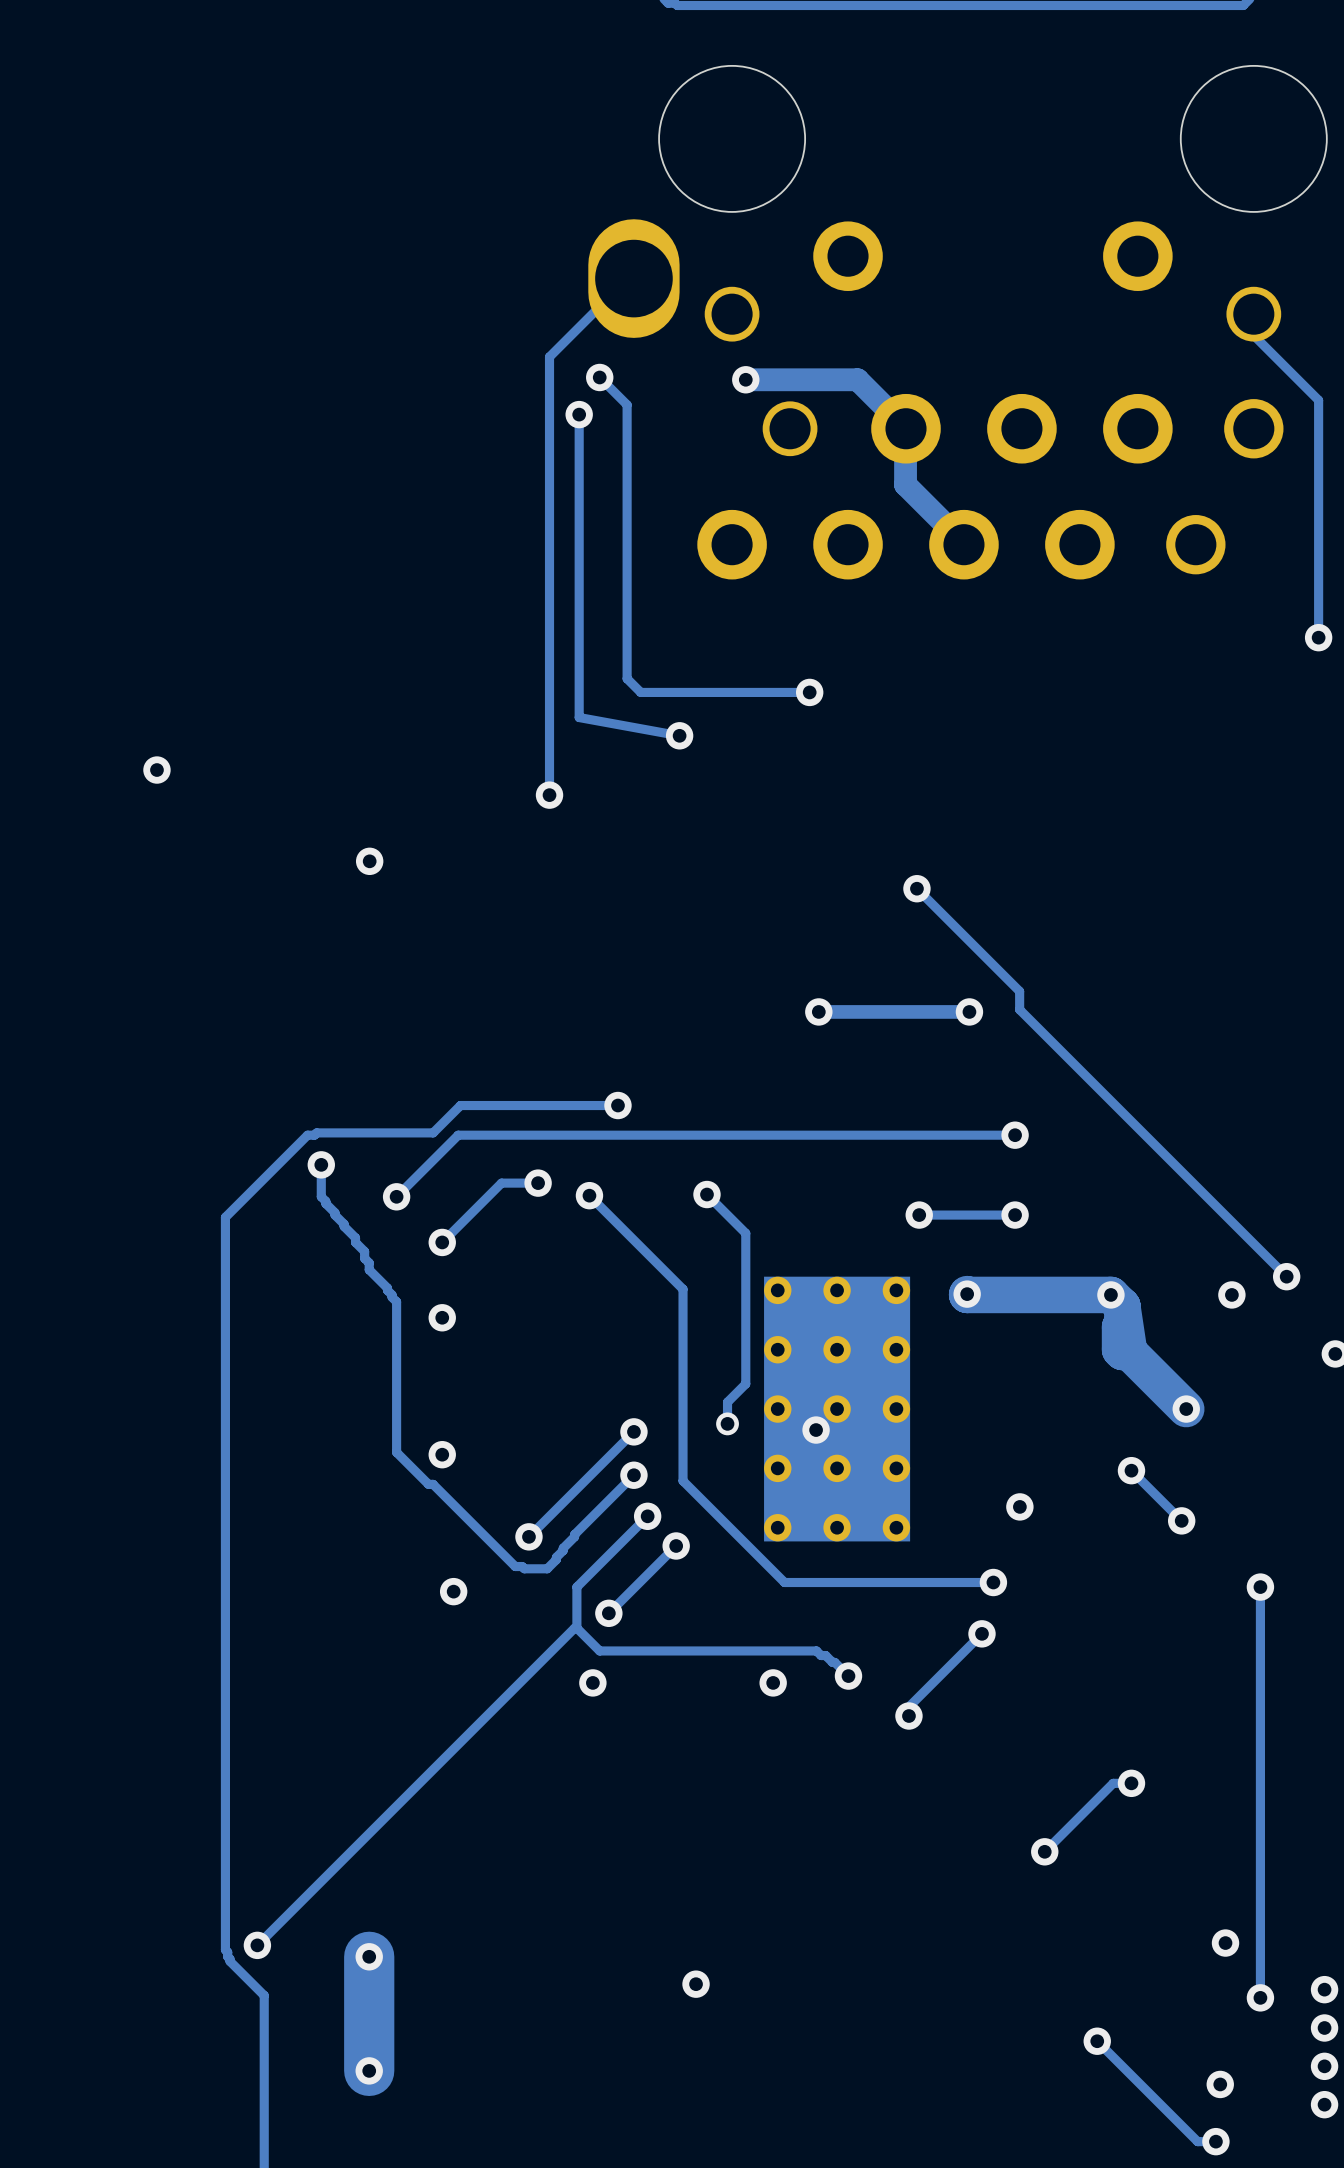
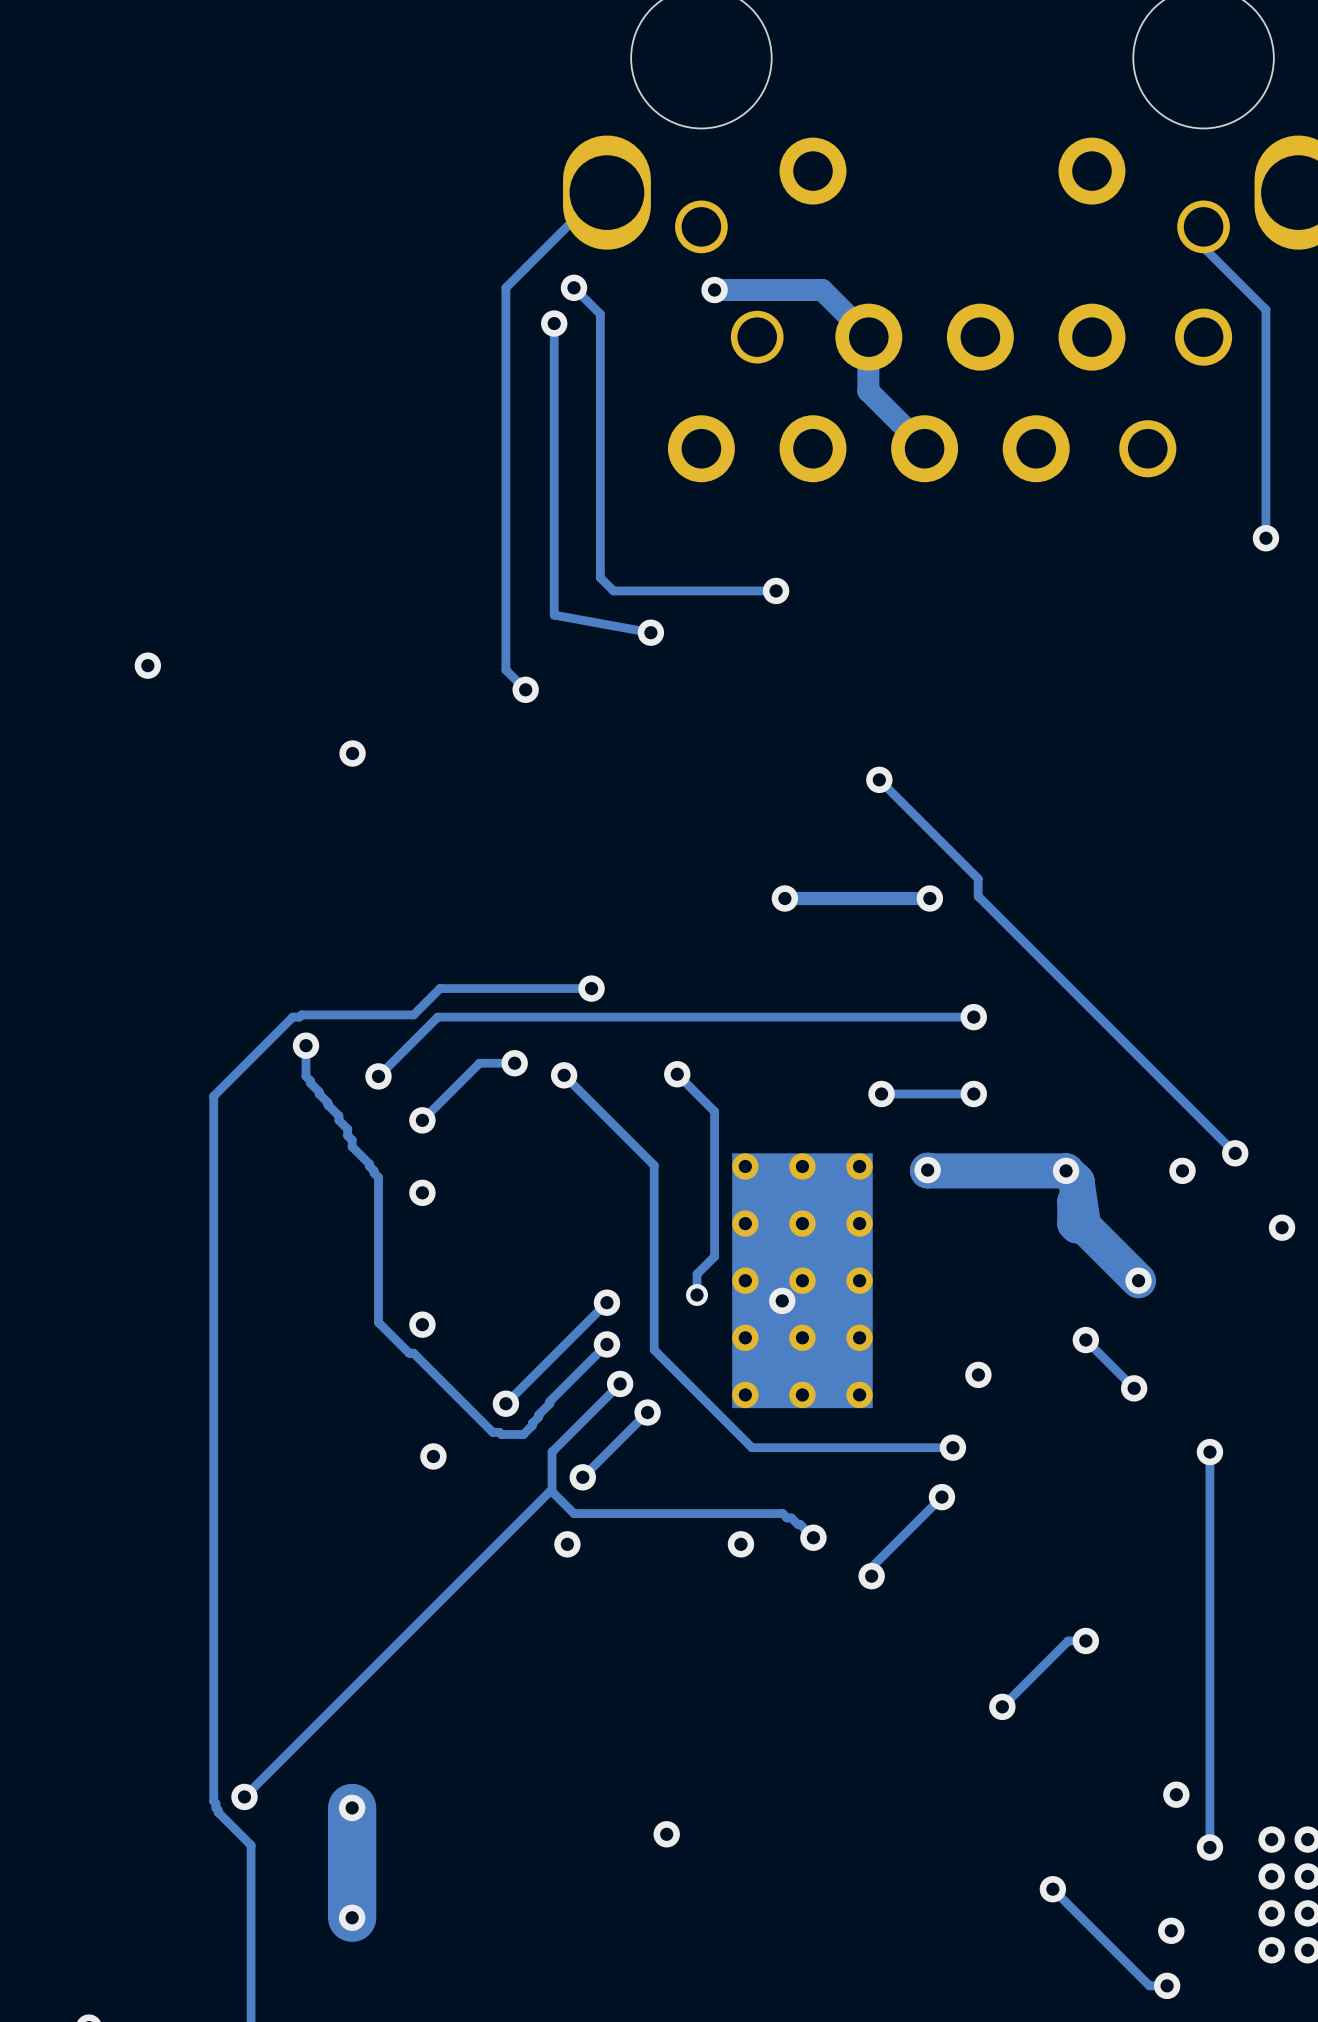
track: (549, 356) (549, 795) -> (525, 268) (505, 287) (505, 670) (525, 689)

